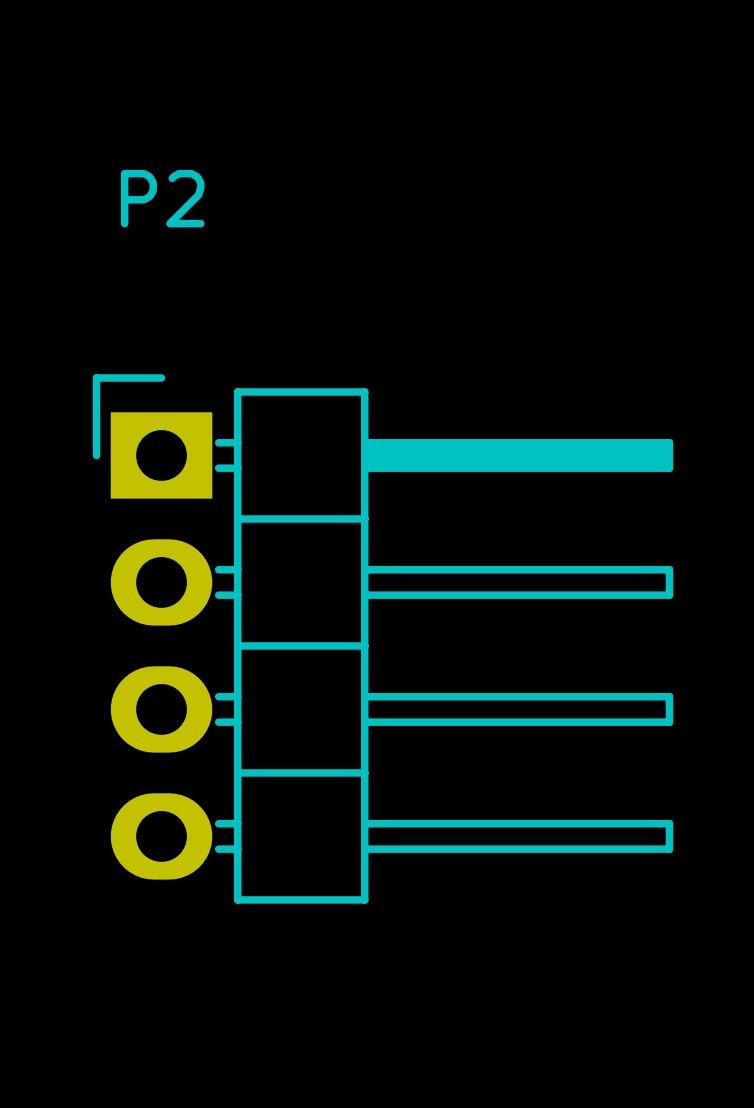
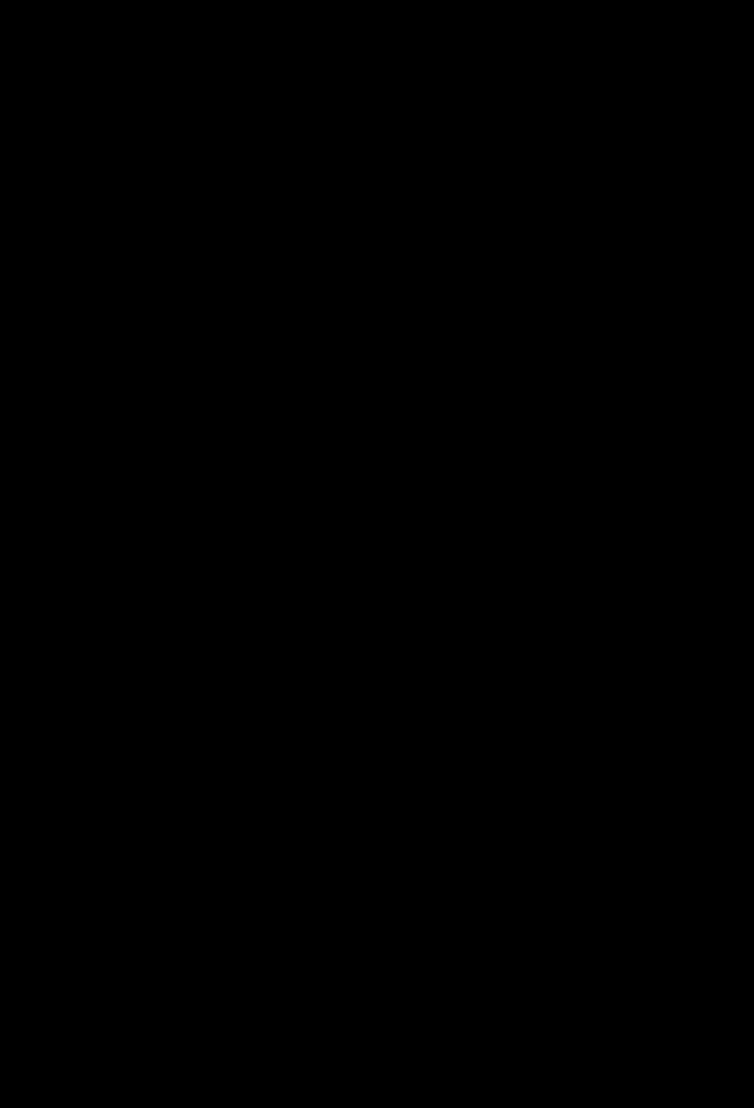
P2: (383, 638) -> none

